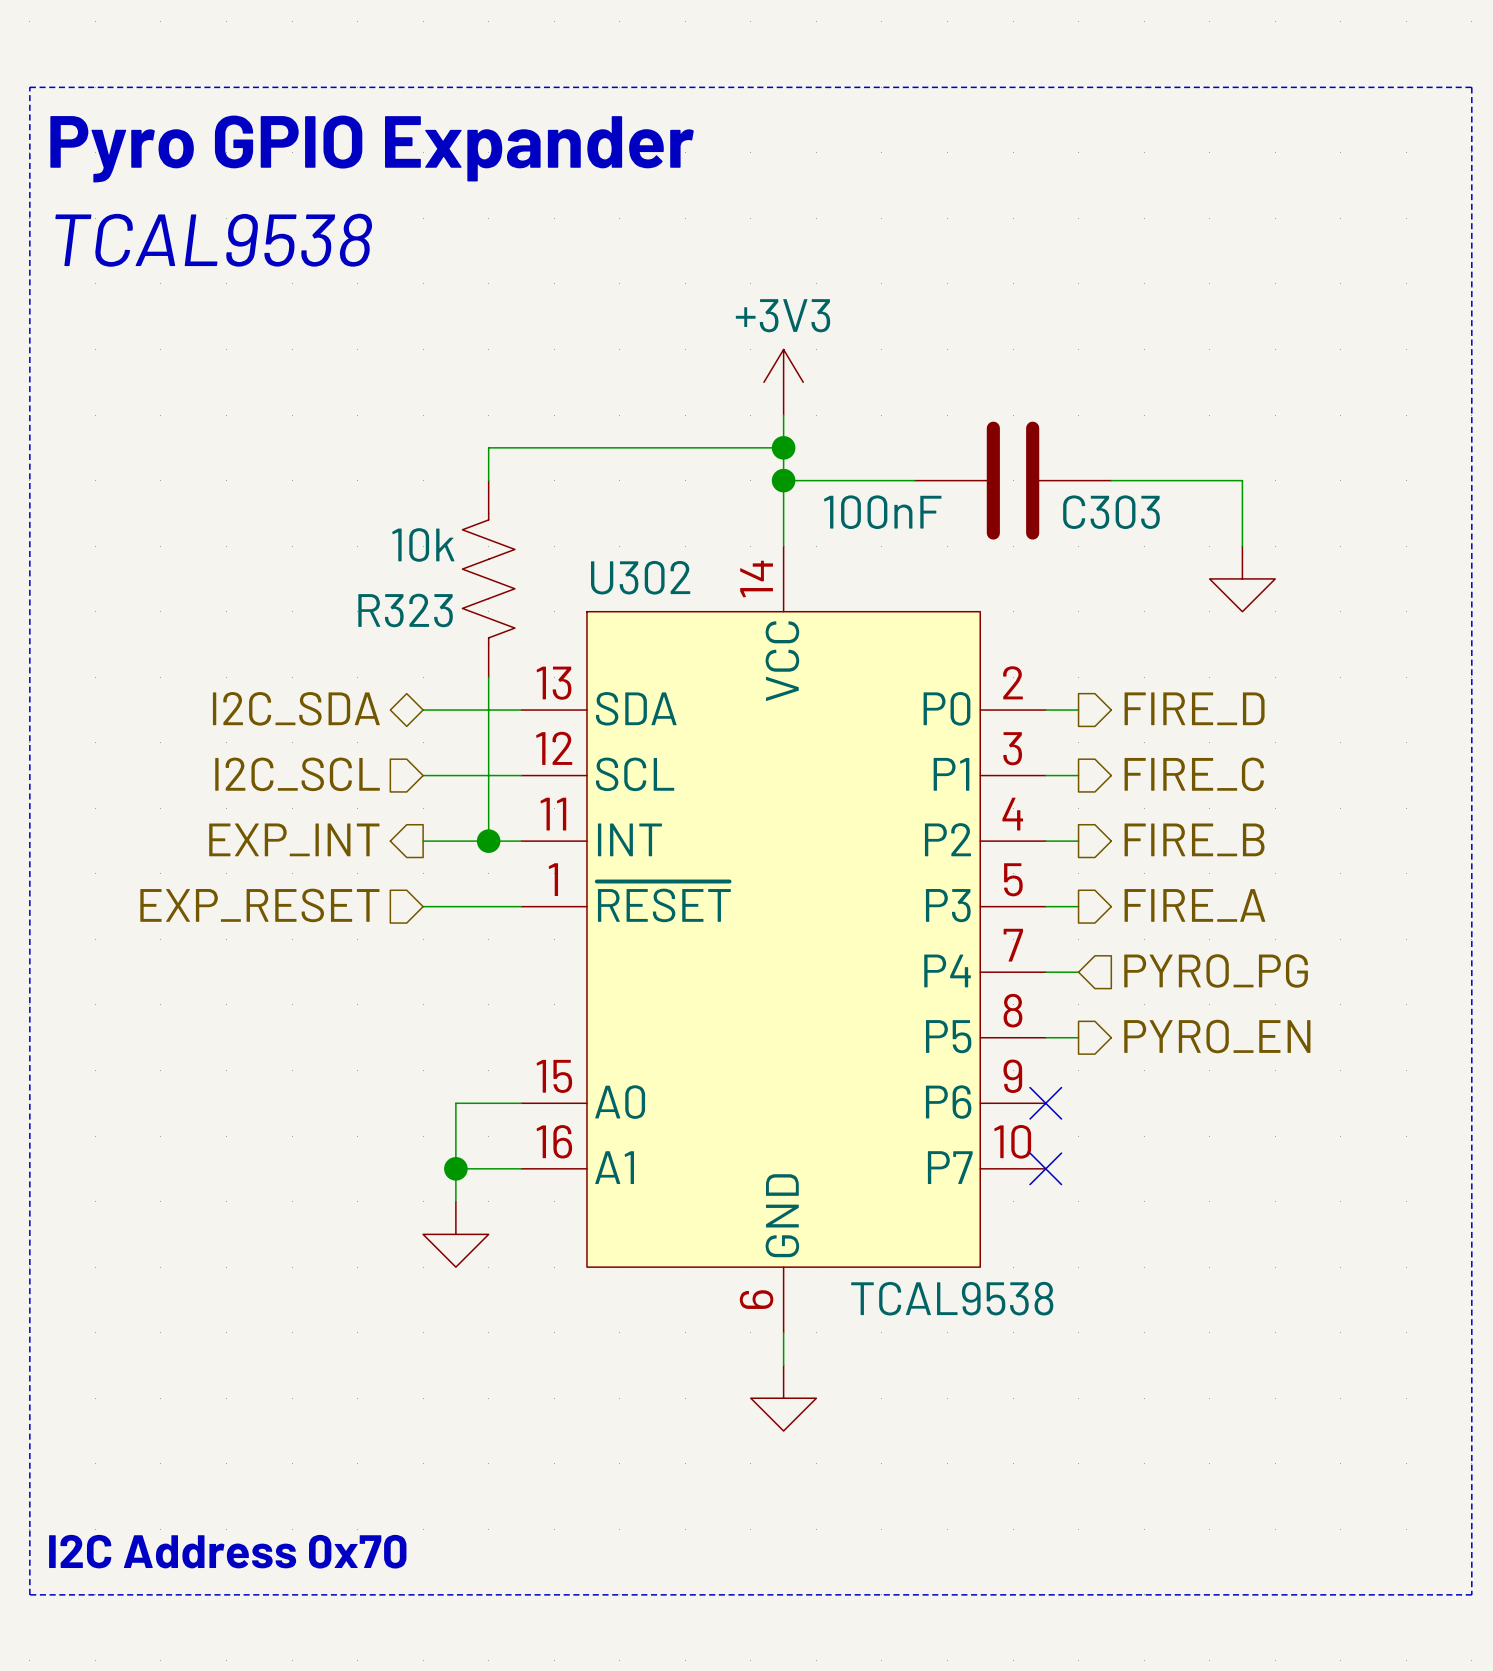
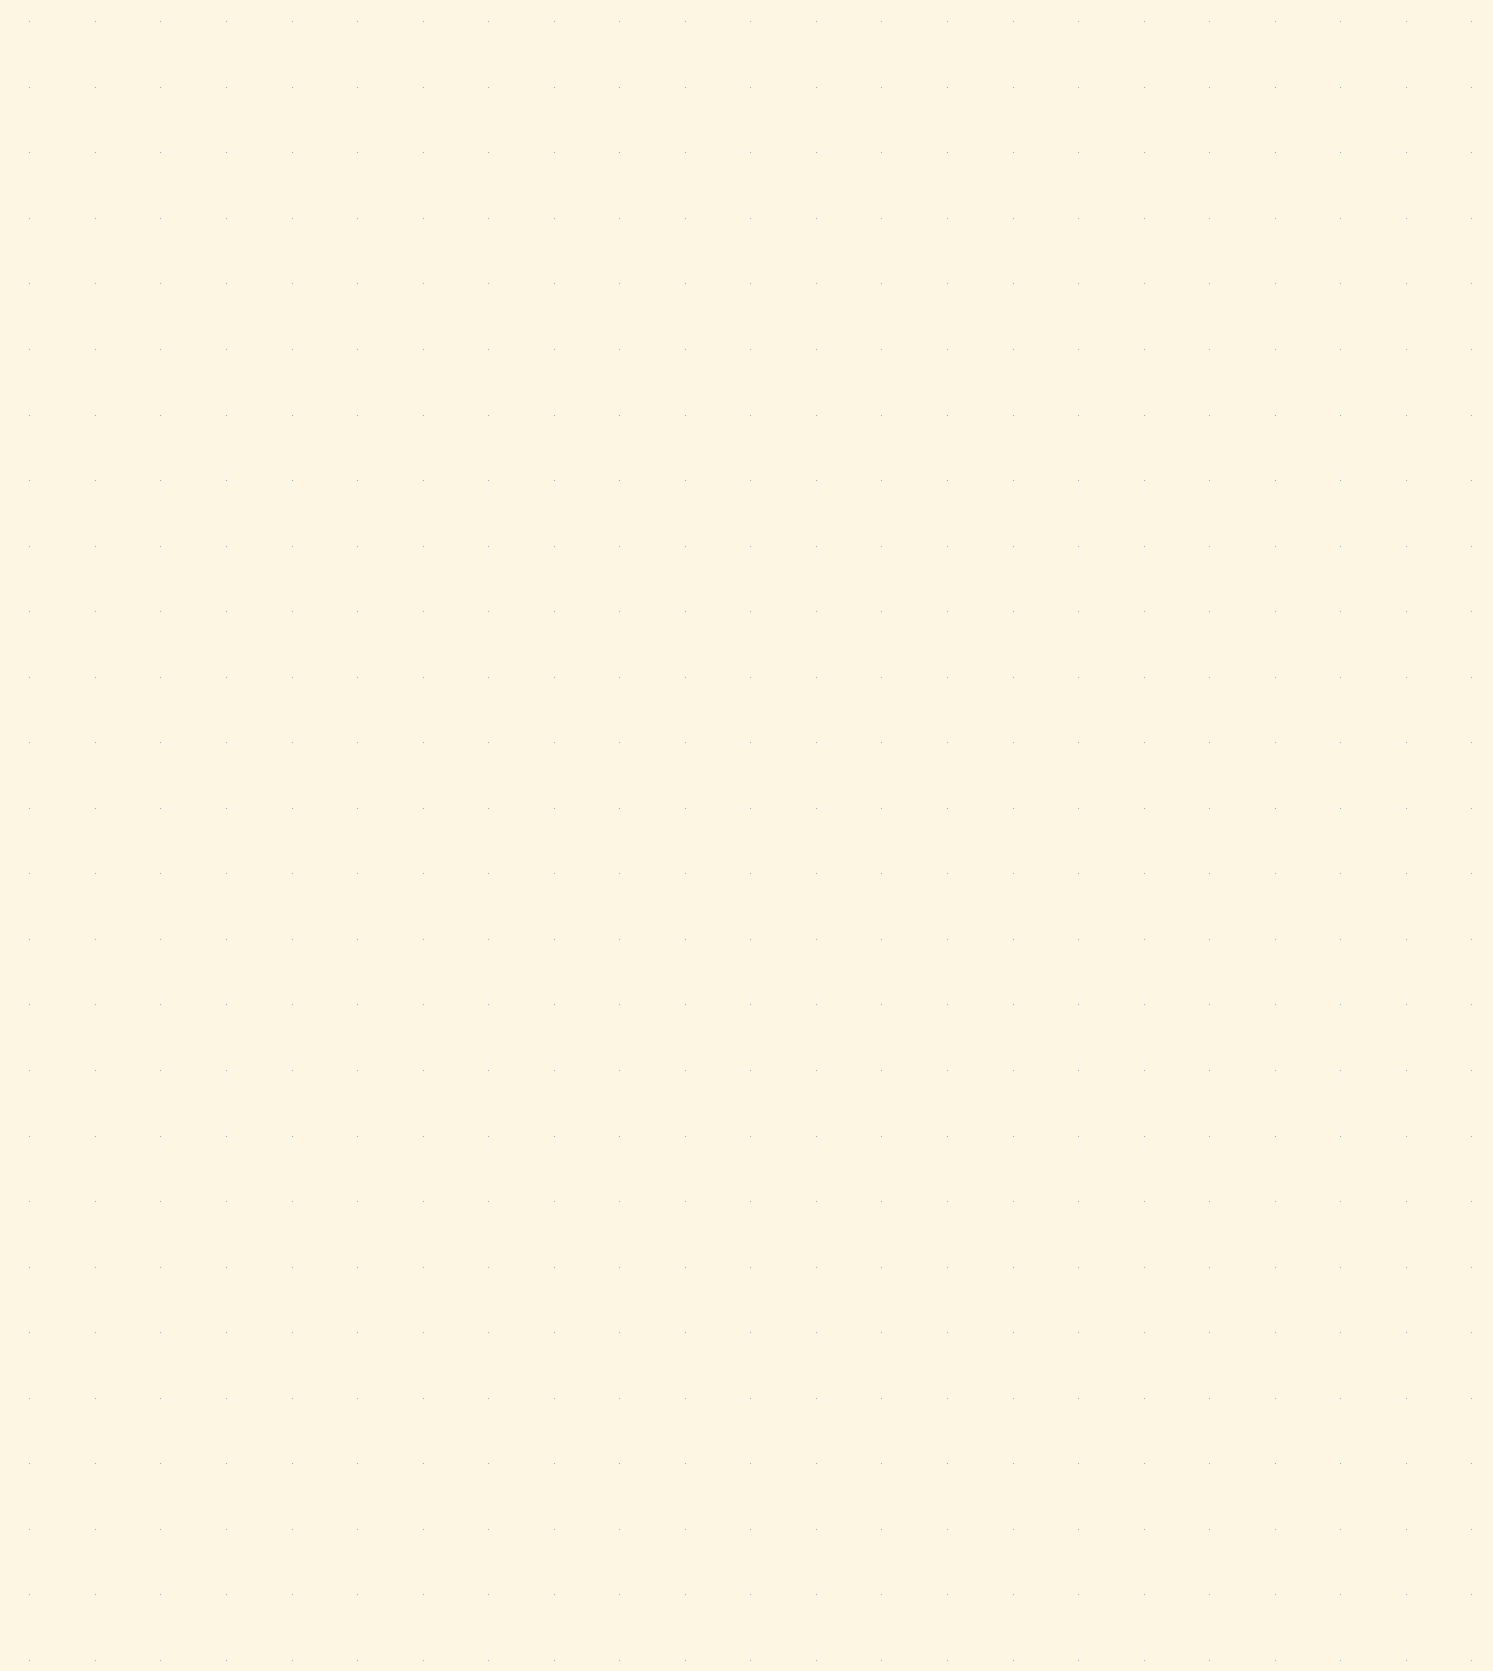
line: (29, 87) (1471, 87) (1471, 1594) (29, 1594) (29, 87) -> none
text: Pyro GPIO Expander (372, 148) -> none
text: TCAL9538 (213, 240) -> none
power symbol: +3V3 (783, 382) -> none
wire: (783, 415) (783, 546) -> none
wire: (783, 447) (488, 447) (488, 480) -> none
junction: (783, 447) -> none
wire: (783, 480) (914, 480) -> none
junction: (783, 480) -> none
C303: 100nF (1013, 480) -> none
wire: (1111, 480) (1242, 480) (1242, 546) -> none
R323: 10k (488, 578) -> none
power symbol: (1242, 578) -> none
wire: (488, 677) (488, 841) -> none
hierarchical label: I2C_SDA (296, 708) -> none
hierarchical label: FIRE_D (1194, 708) -> none
wire: (423, 710) (521, 710) -> none
wire: (1045, 710) (1078, 710) -> none
hierarchical label: I2C_SCL (297, 774) -> none
hierarchical label: FIRE_C (1194, 774) -> none
wire: (423, 775) (521, 775) -> none
wire: (1045, 775) (1078, 775) -> none
hierarchical label: EXP_INT (294, 839) -> none
hierarchical label: FIRE_B (1194, 839) -> none
wire: (423, 841) (521, 841) -> none
junction: (488, 841) -> none
wire: (1045, 841) (1078, 841) -> none
hierarchical label: EXP_RESET (259, 905) -> none
hierarchical label: FIRE_A (1194, 905) -> none
wire: (423, 906) (521, 906) -> none
wire: (1045, 906) (1078, 906) -> none
U302: TCAL9538 (783, 939) -> none
hierarchical label: PYRO_PG (1216, 970) -> none
wire: (1045, 972) (1078, 972) -> none
hierarchical label: PYRO_EN (1217, 1036) -> none
wire: (1045, 1037) (1078, 1037) -> none
wire: (521, 1103) (455, 1103) (455, 1201) -> none
no-connect mark: (1045, 1103) -> none
wire: (455, 1168) (521, 1168) -> none
junction: (455, 1168) -> none
no-connect mark: (1045, 1168) -> none
power symbol: (455, 1234) -> none
wire: (783, 1332) (783, 1365) -> none
power symbol: (783, 1398) -> none
text: I2C Address 0x70 (227, 1551) -> none

